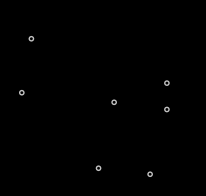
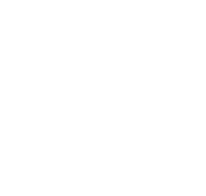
via: (31, 38) -> none
via: (166, 83) -> none
via: (21, 92) -> none
via: (114, 102) -> none
via: (166, 109) -> none
via: (98, 168) -> none
via: (150, 174) -> none

